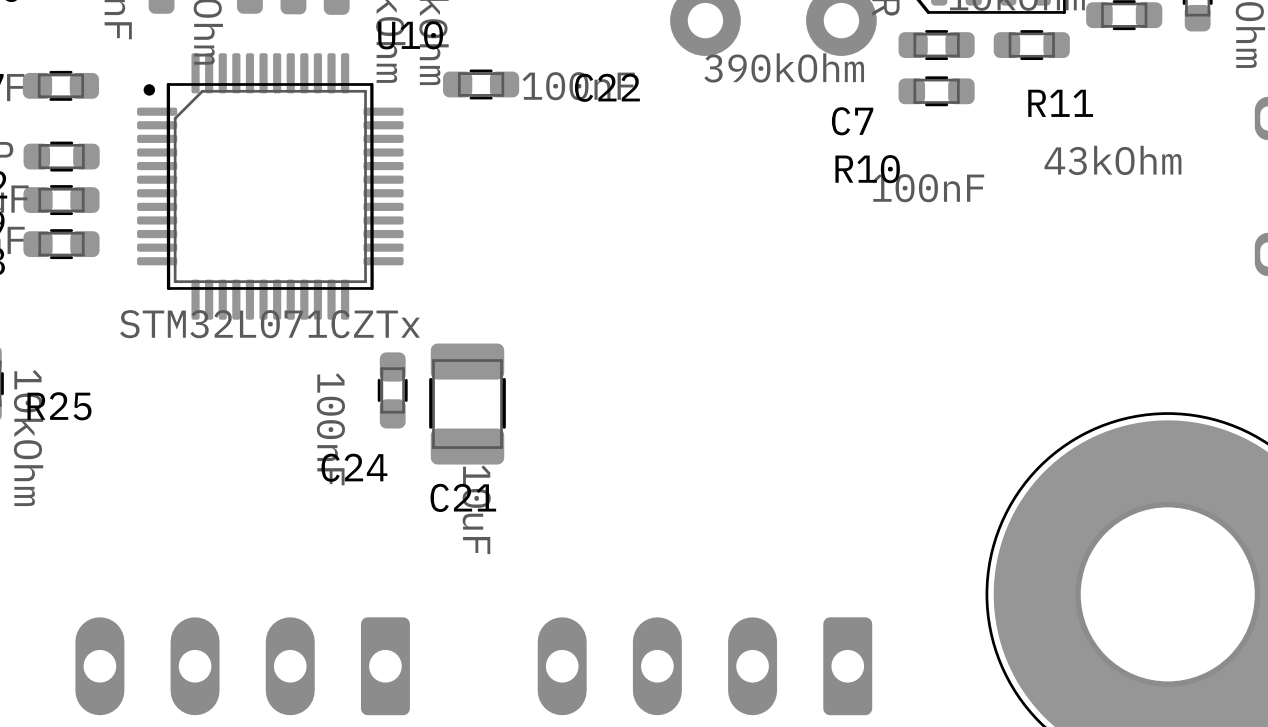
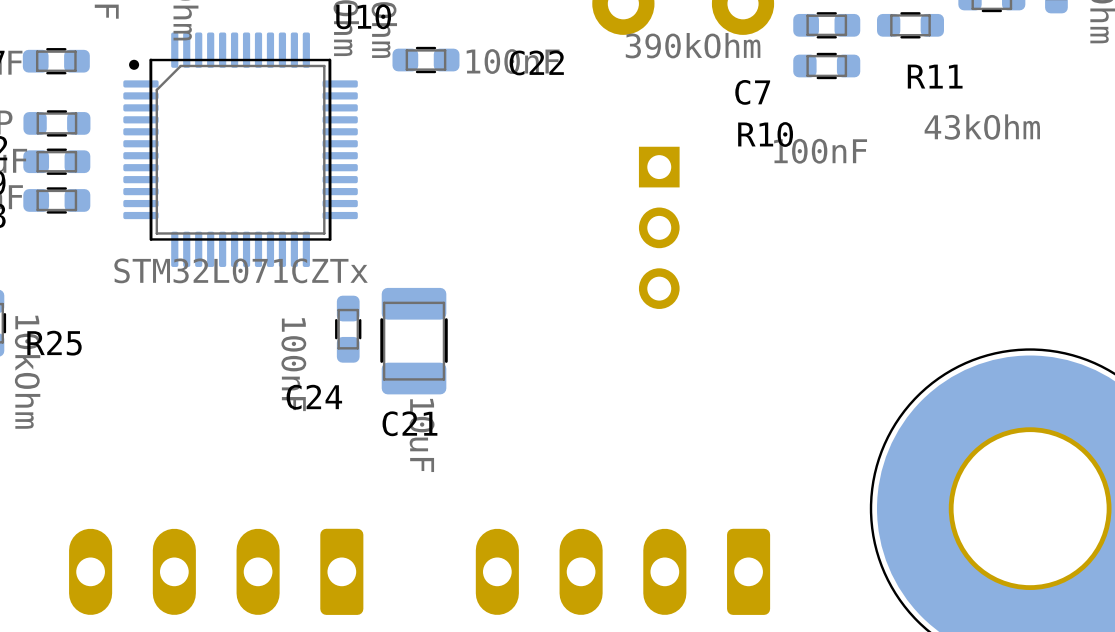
part: none -> (659, 227)

